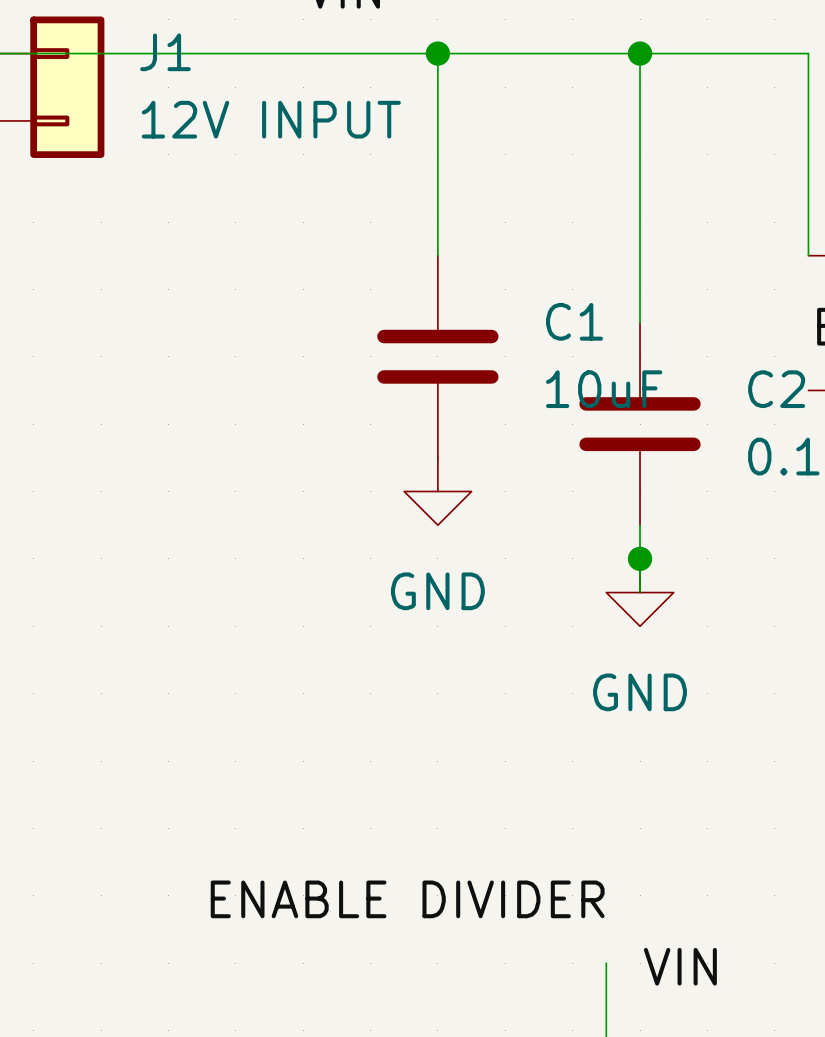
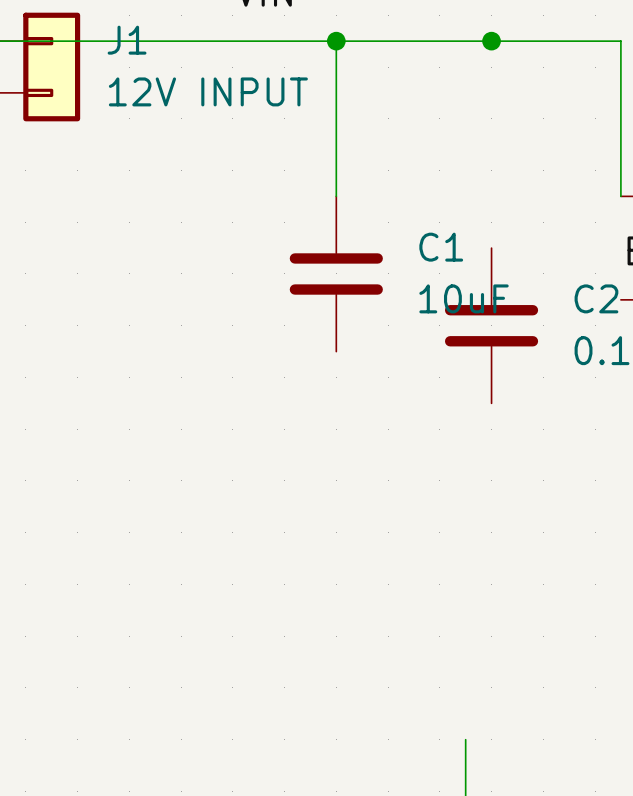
wire: (640, 53) (640, 323) -> none
power symbol: GND (437, 491) -> none
wire: (640, 525) (640, 592) -> none
junction: (640, 558) -> none
power symbol: GND (640, 592) -> none
label: ENABLE DIVIDER (407, 899) -> none
label: VIN (680, 966) -> none

